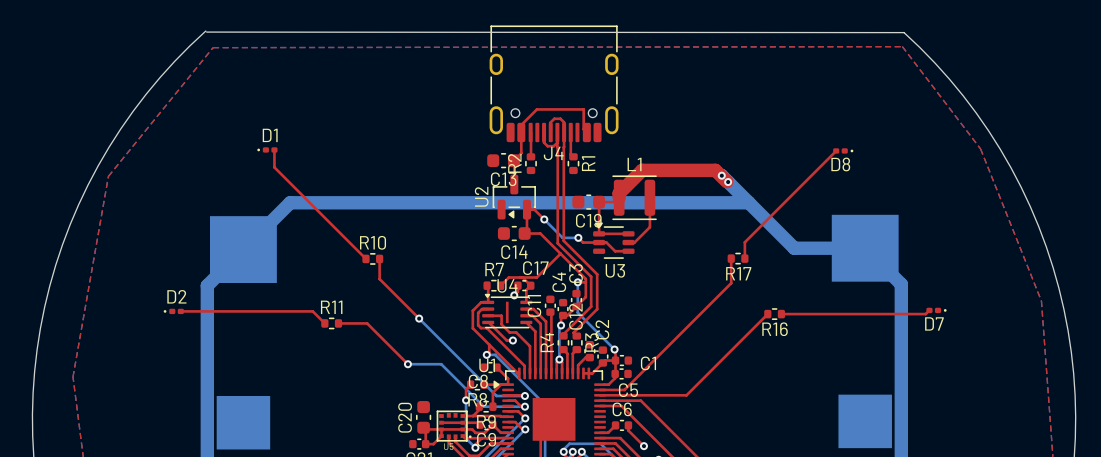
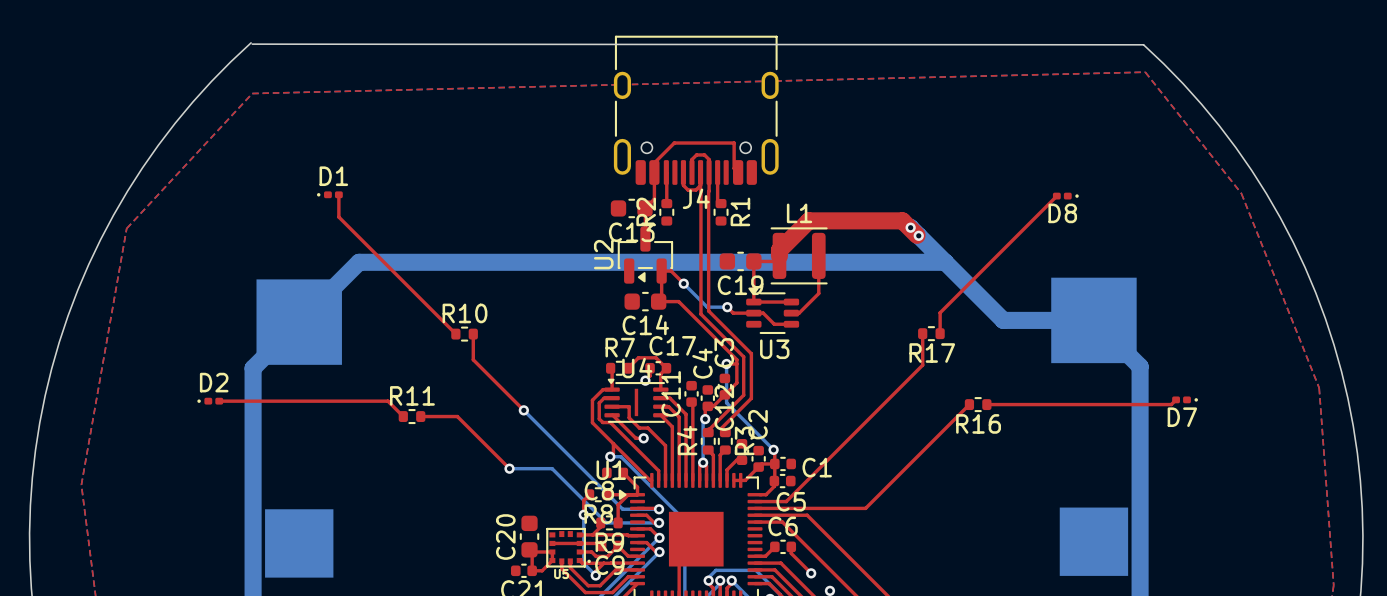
top zone outline: (980, 148) (902, 46) (213, 47) (108, 176) -> (1241, 193) (1145, 72) (252, 93) (126, 228)
top track: (560, 253) (536, 277) (522, 277) -> none
top track: (441, 429) (462, 429) -> none

